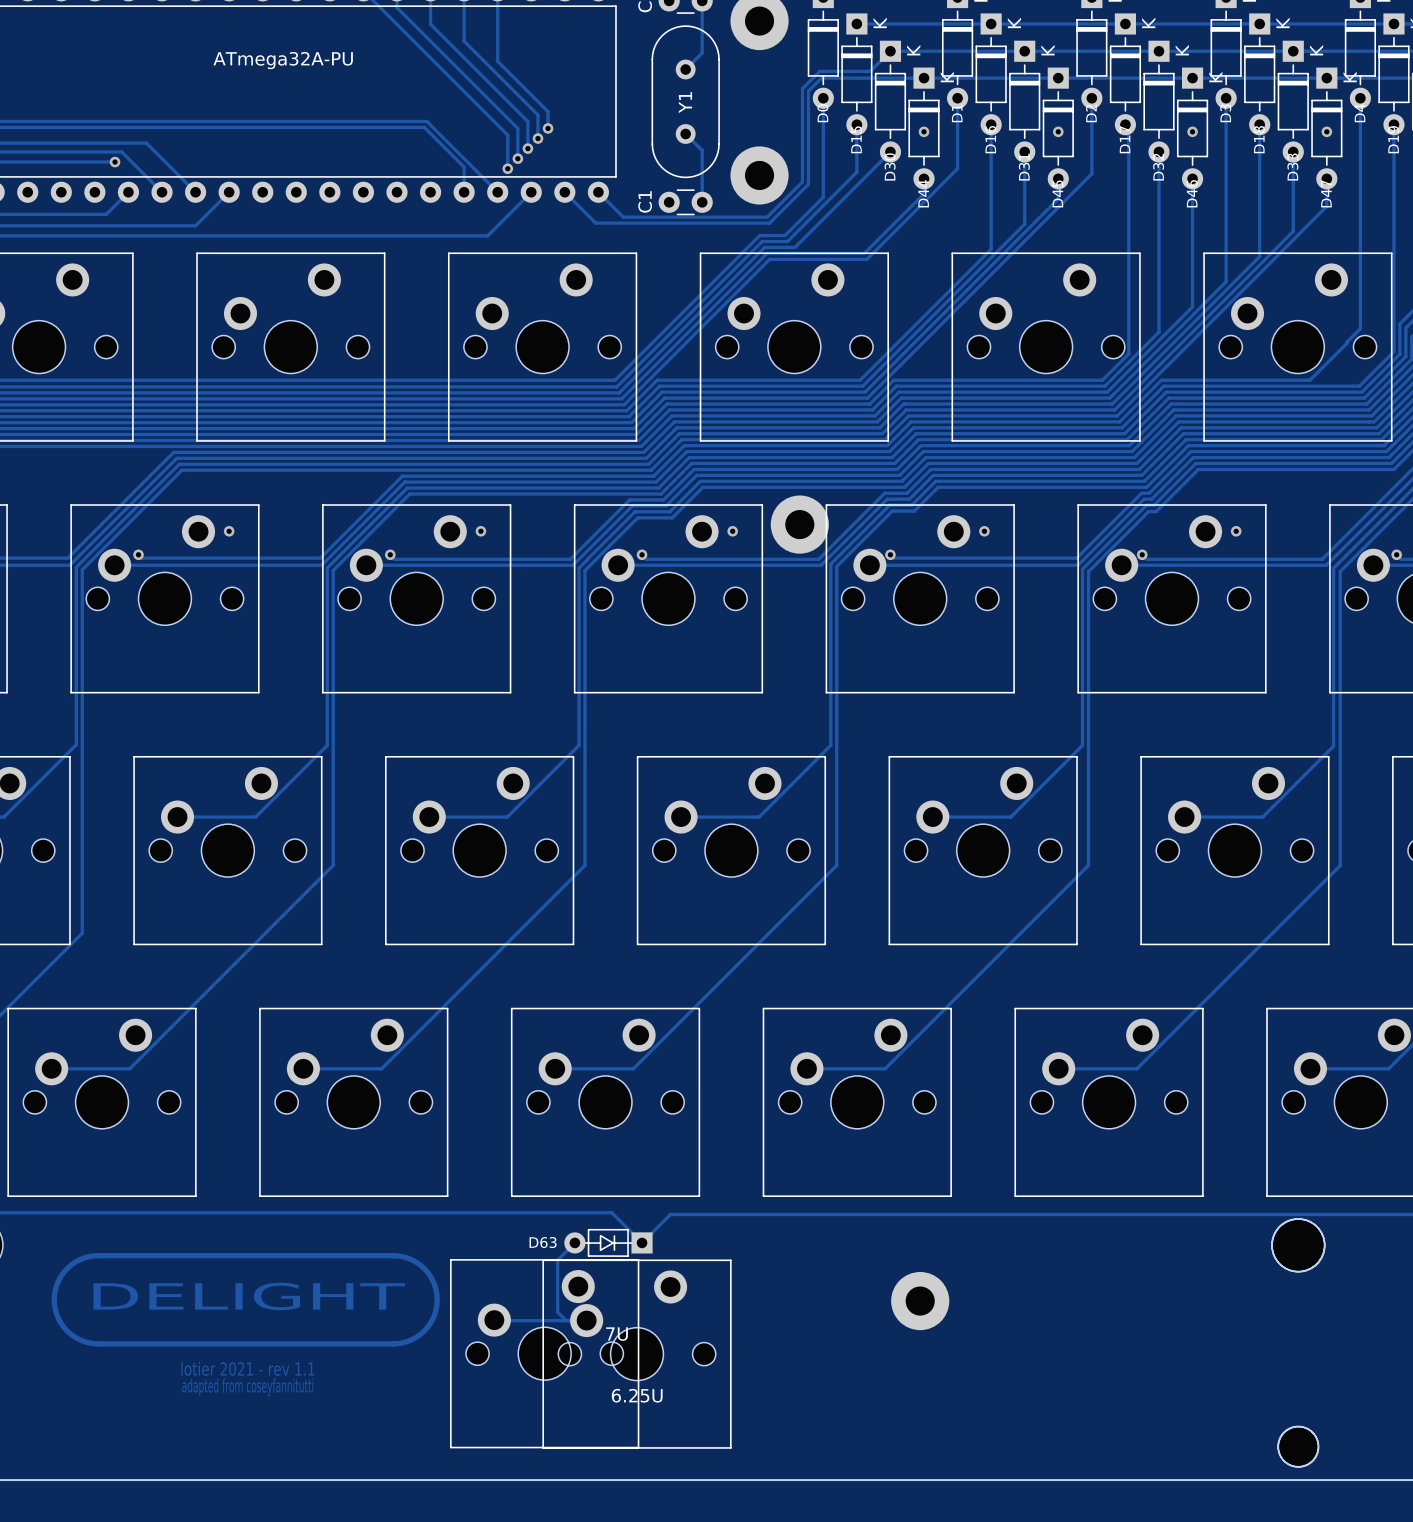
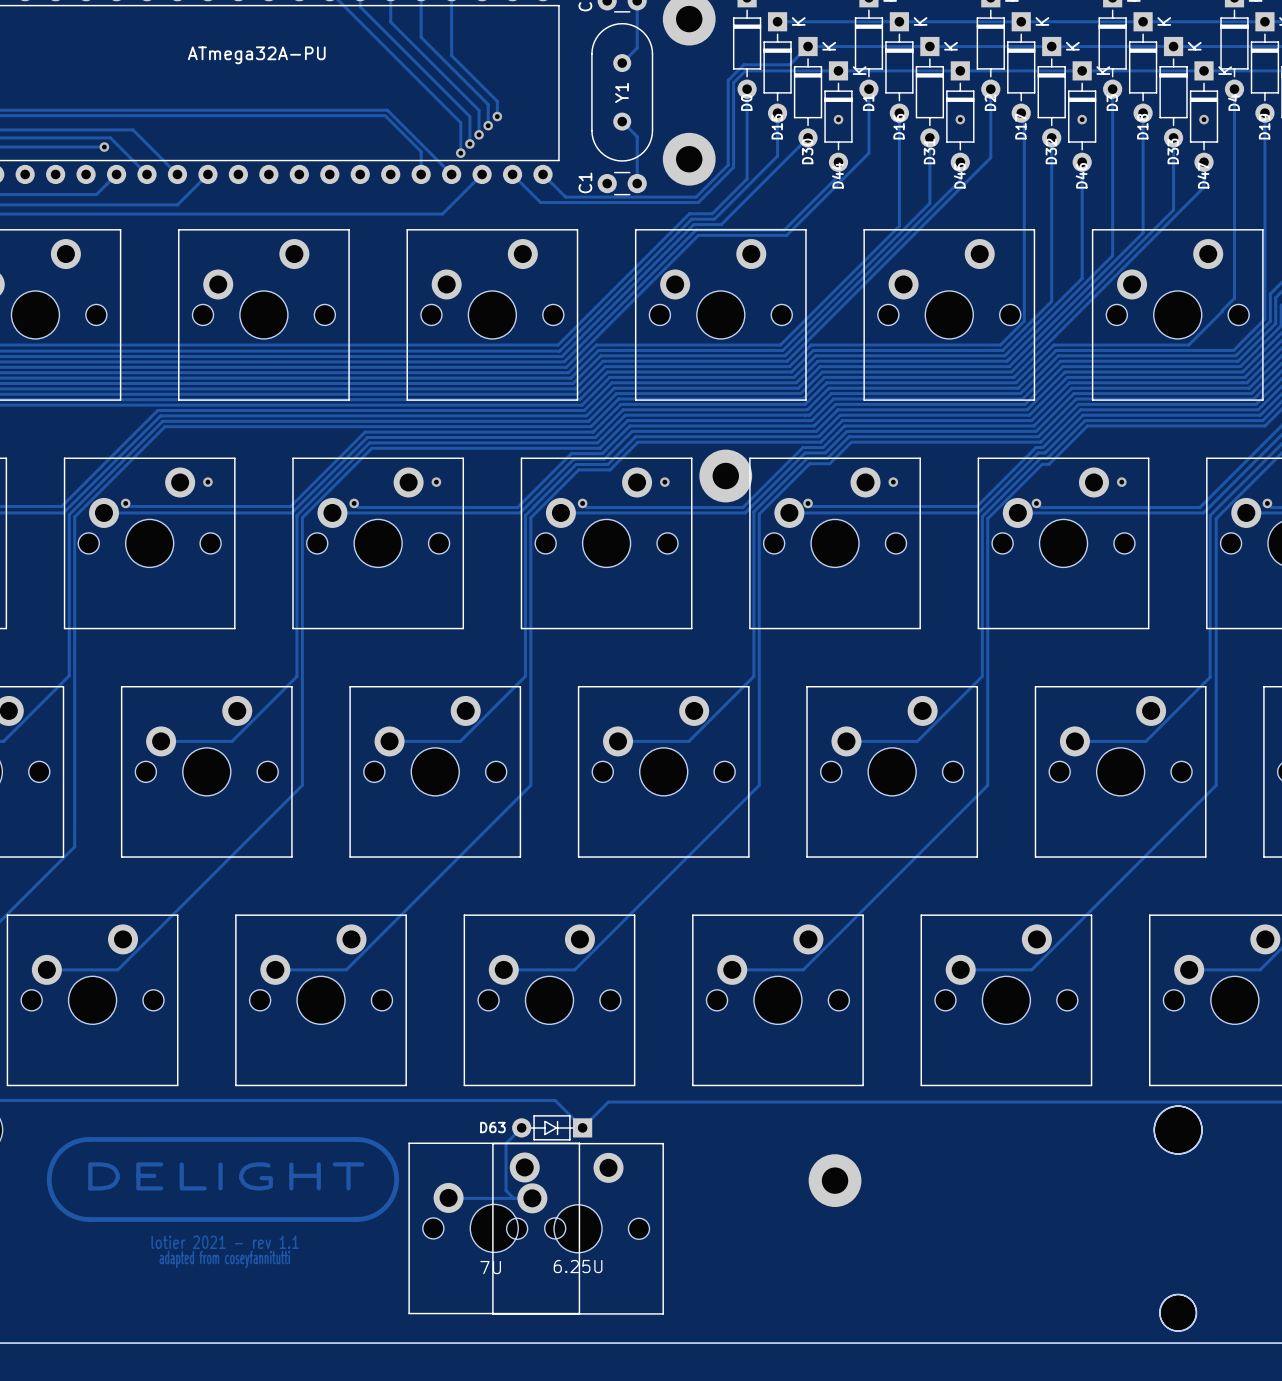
part value position: 7U (617, 1334) -> 7U (490, 1267)

